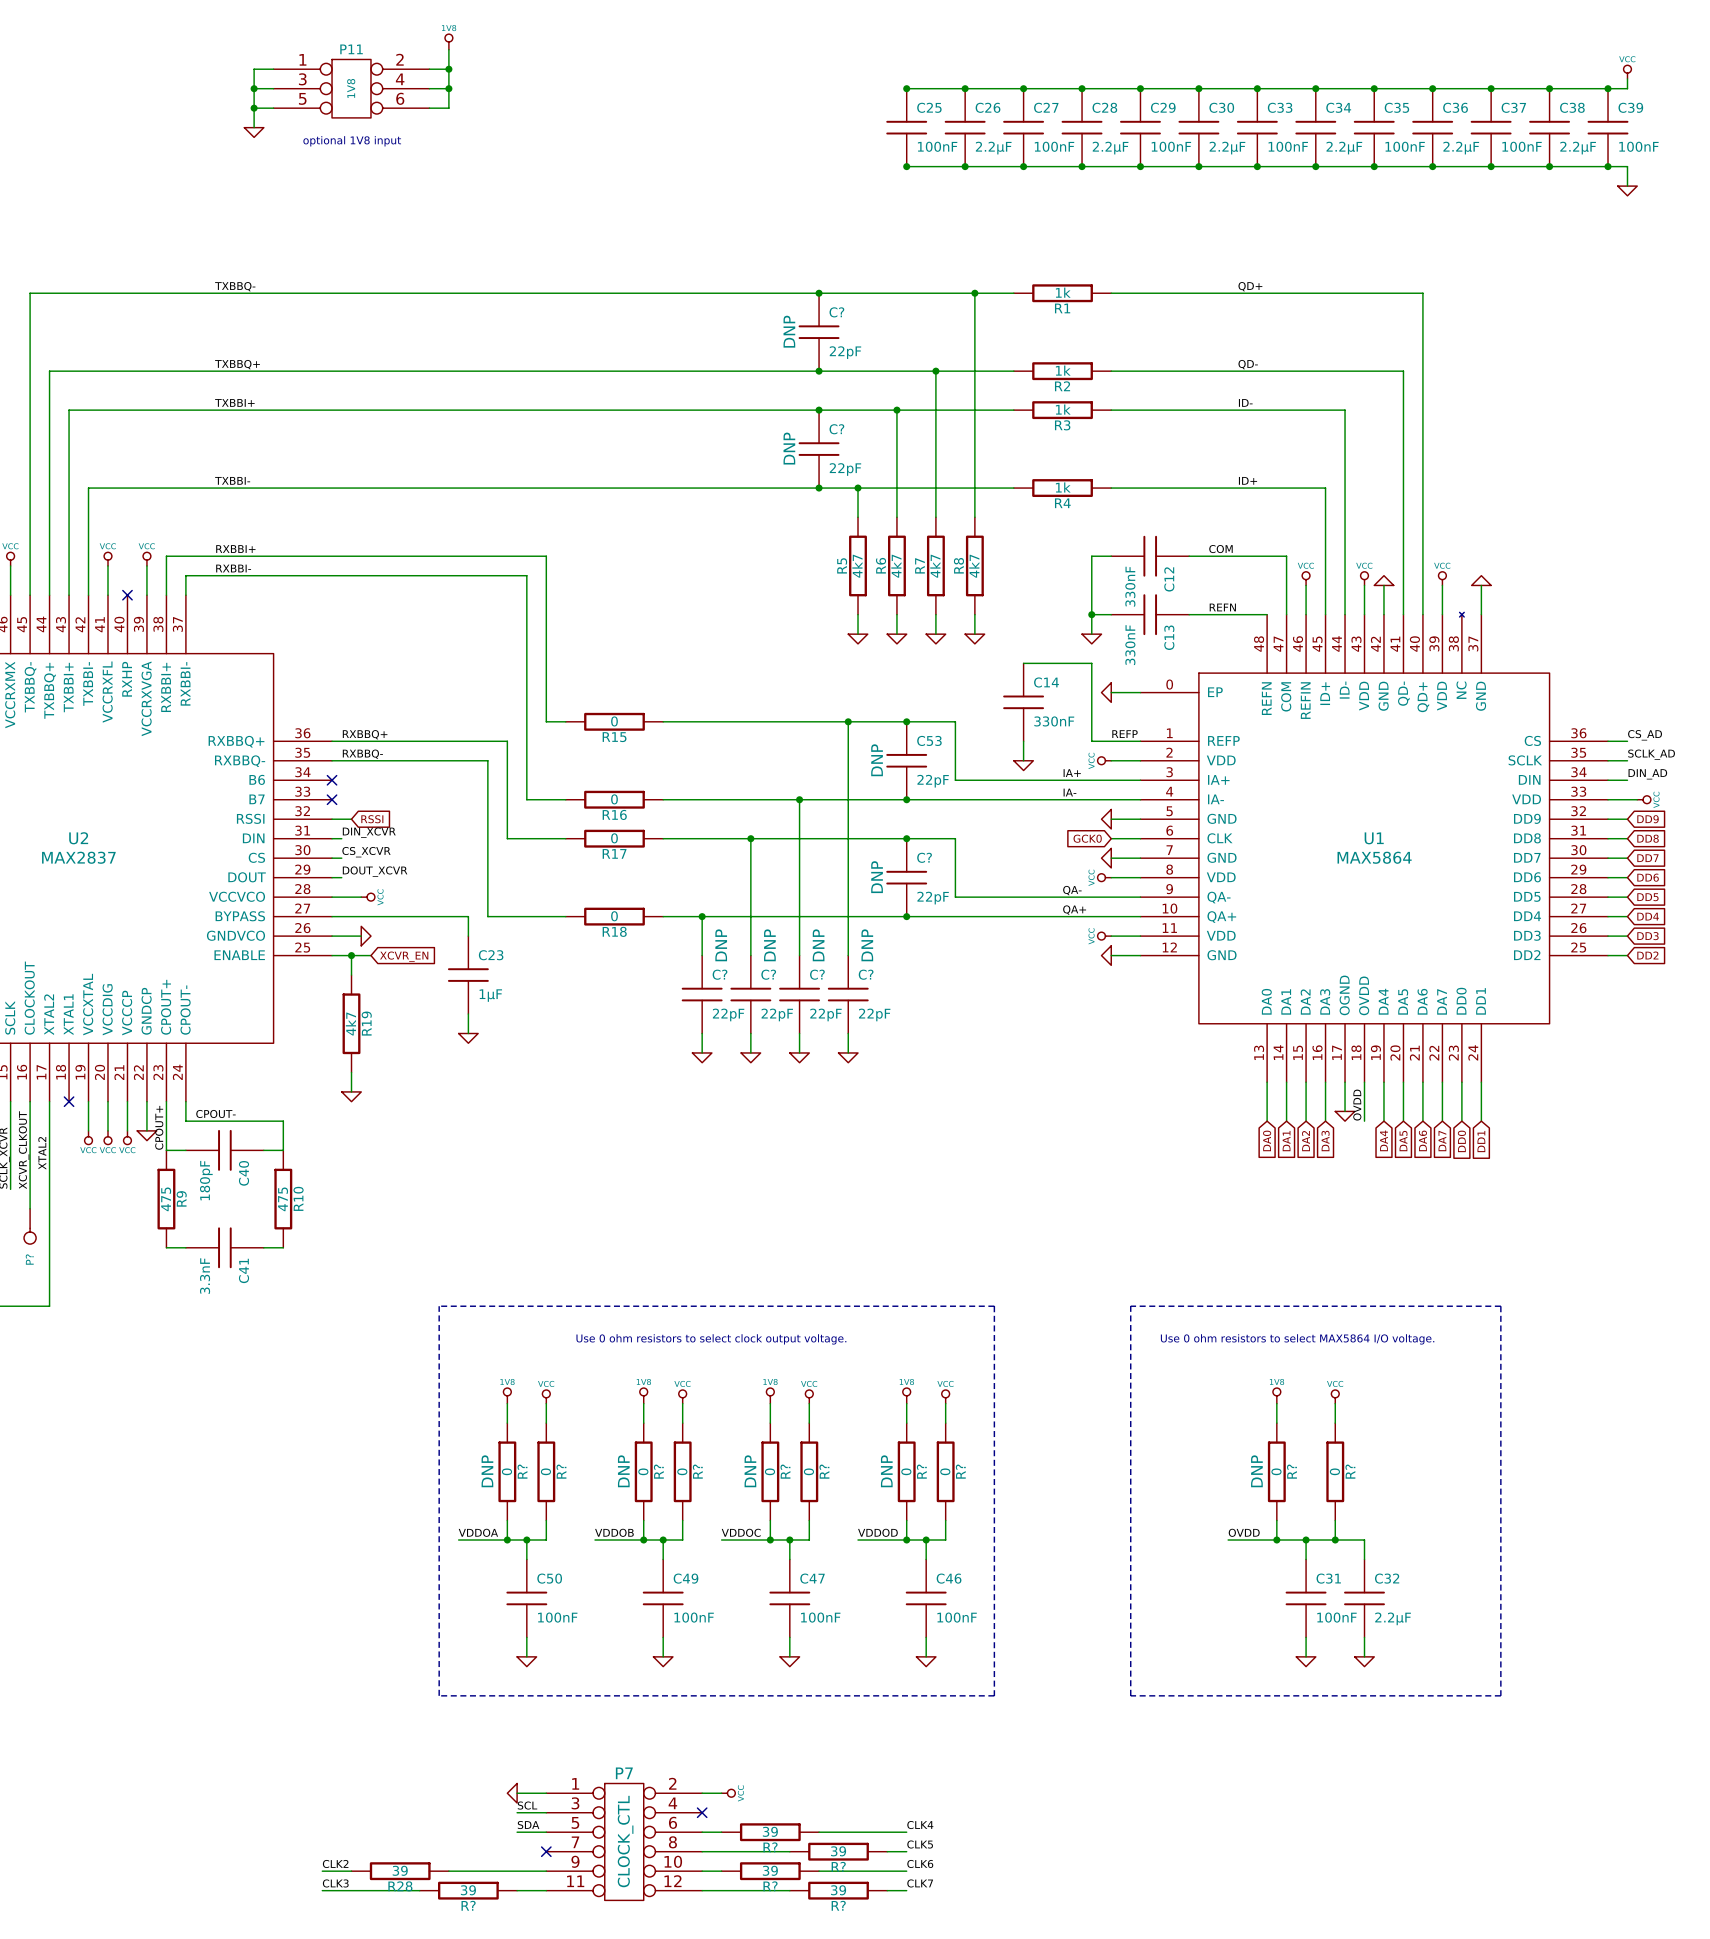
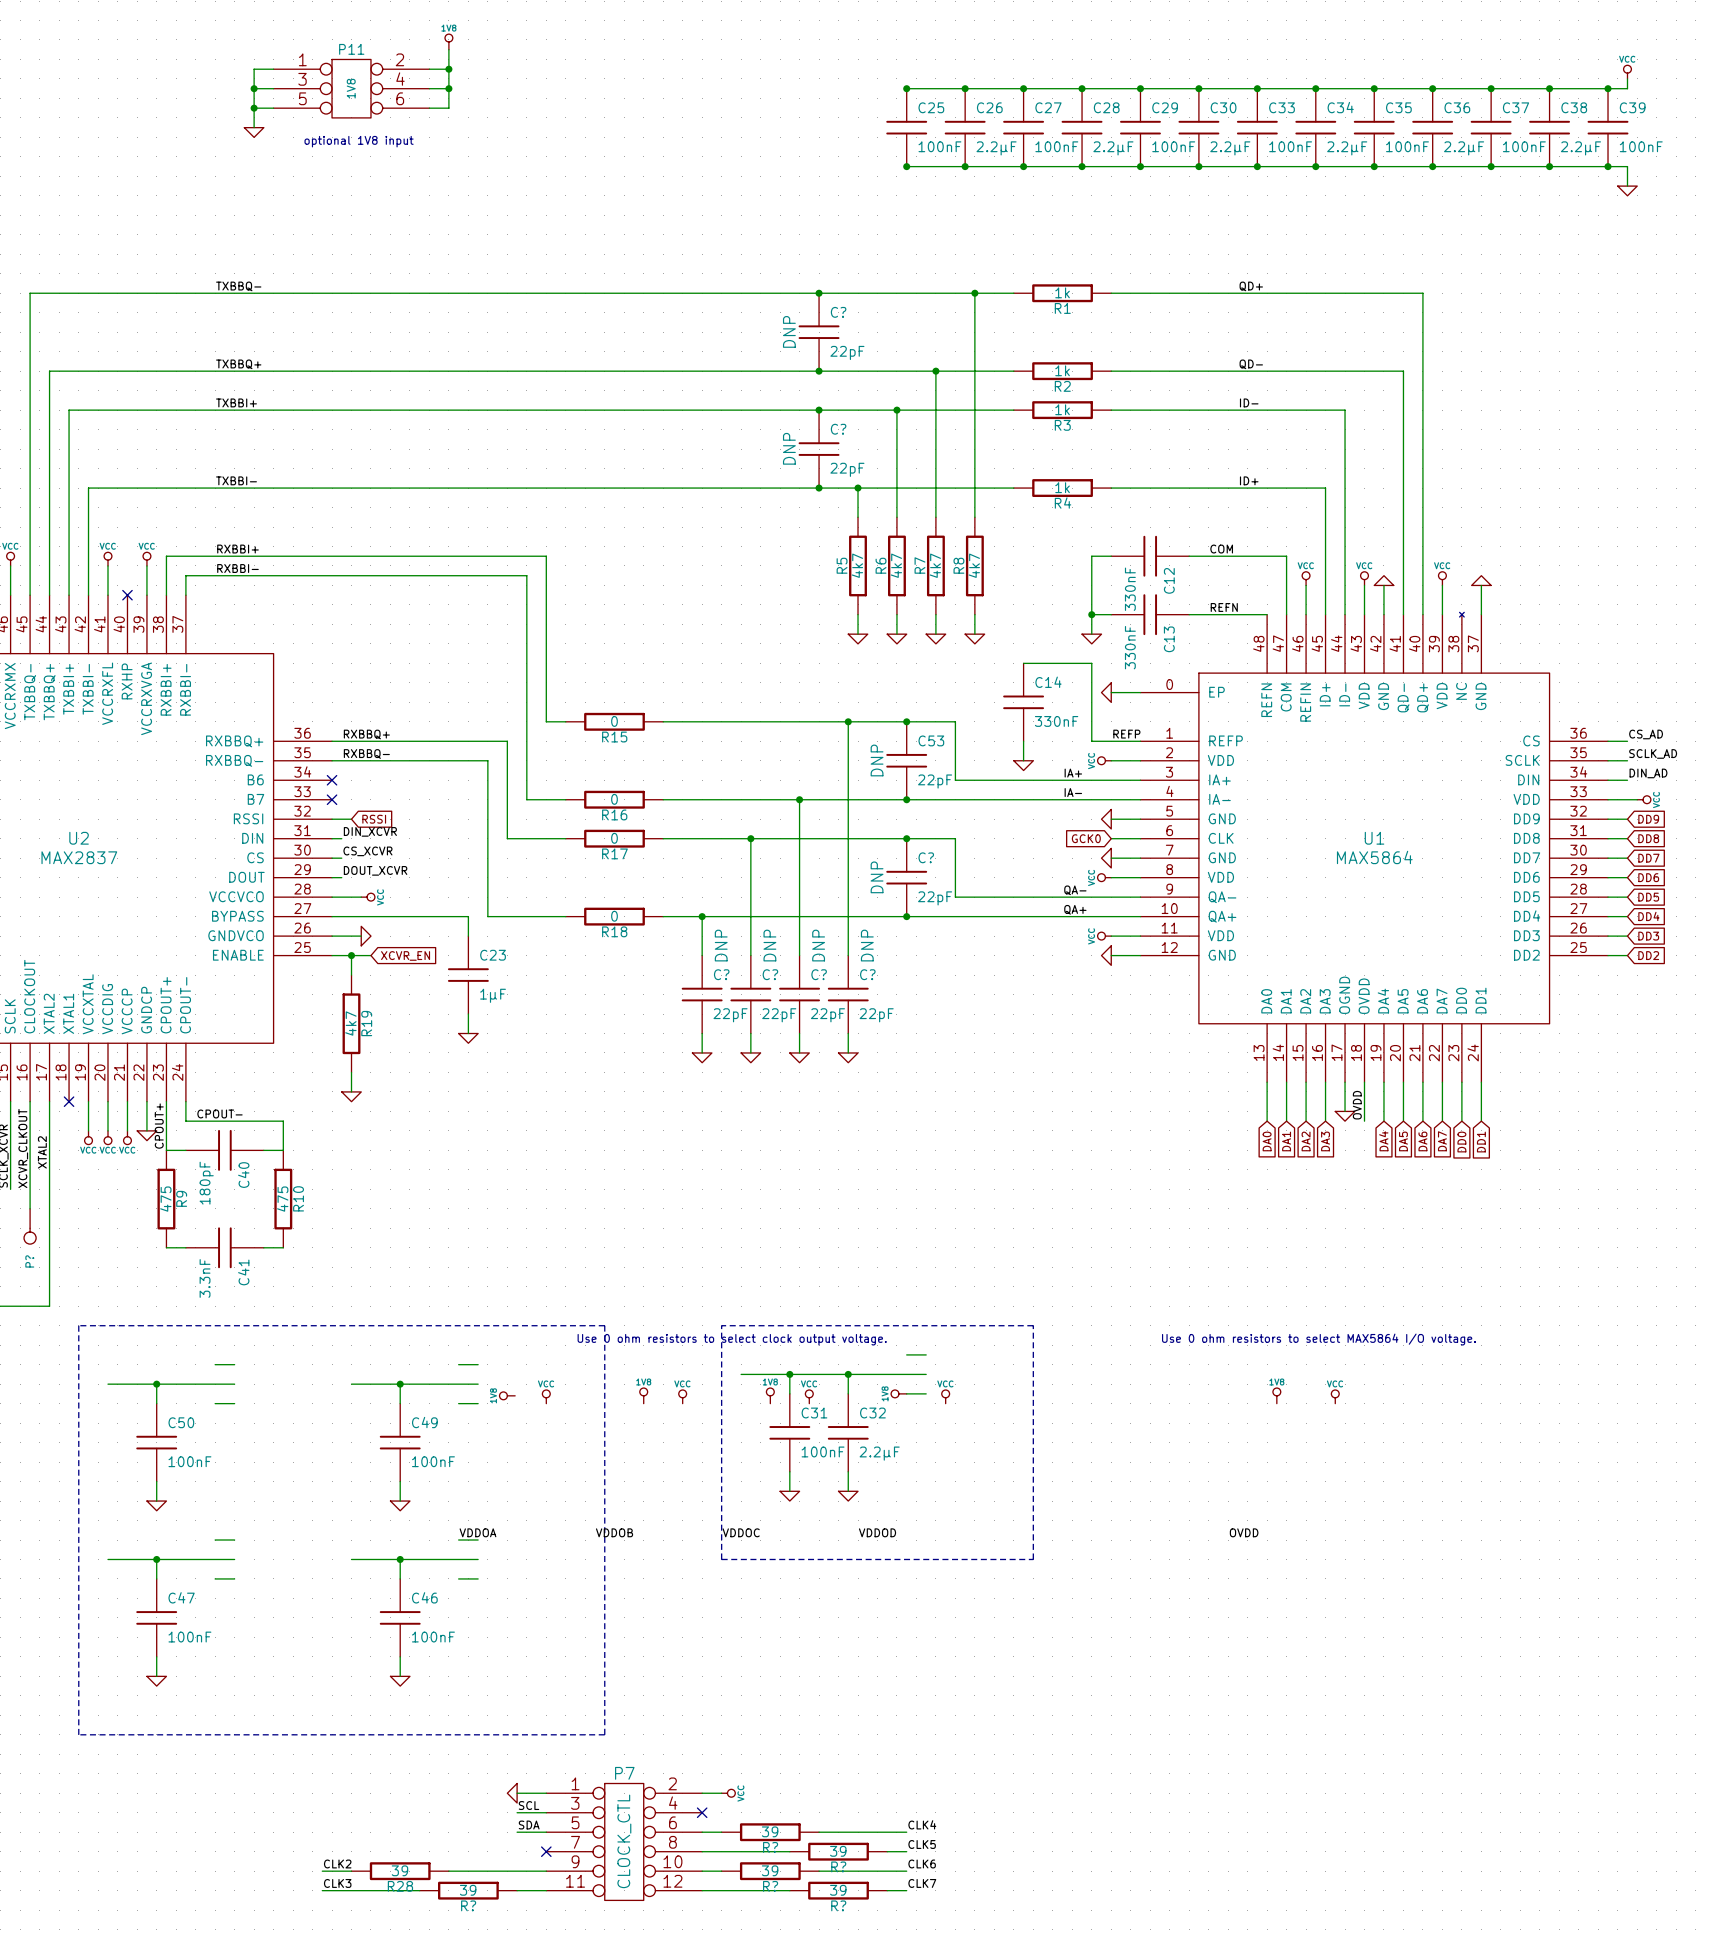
line: (439, 1306) (994, 1306) (994, 1695) (439, 1695) (439, 1306) -> none
line: (1130, 1306) (1500, 1306) (1500, 1695) (1130, 1695) (1130, 1306) -> none
line: none -> (78, 1325) (604, 1325) (604, 1734) (78, 1734) (78, 1325)
line: none -> (721, 1325) (721, 1559) (1033, 1559) (1033, 1325) (721, 1325)
wire: none -> (906, 1354) (926, 1354)
wire: none -> (215, 1364) (234, 1364)
wire: none -> (458, 1364) (478, 1364)
wire: none -> (741, 1374) (926, 1374)
junction: none -> (789, 1374)
junction: none -> (848, 1374)
wire: none -> (108, 1384) (234, 1384)
wire: none -> (156, 1384) (156, 1403)
junction: none -> (156, 1384)
wire: none -> (351, 1384) (478, 1384)
junction: none -> (400, 1384)
wire: none -> (906, 1393) (926, 1393)
power symbol rotation: 0° (507, 1395) -> 90° counterclockwise (507, 1395)
power symbol rotation: 0° (906, 1395) -> 90° counterclockwise (898, 1393)
wire: none -> (215, 1403) (234, 1403)
wire: none -> (458, 1403) (478, 1403)
wire: (507, 1403) (507, 1423) -> (400, 1384) (400, 1403)
wire: (546, 1403) (546, 1423) -> none
wire: (643, 1403) (643, 1423) -> none
wire: (682, 1403) (682, 1423) -> none
wire: (770, 1403) (770, 1423) -> none
wire: (809, 1403) (809, 1423) -> none
wire: (906, 1403) (906, 1423) -> none
wire: (945, 1403) (945, 1423) -> none
wire: (1276, 1403) (1276, 1423) -> none
wire: (1335, 1403) (1335, 1423) -> none
R?: 0 (507, 1471) -> none
R?: 0 (546, 1471) -> none
R?: 0 (643, 1471) -> none
R?: 0 (682, 1471) -> none
R?: 0 (770, 1471) -> none
R?: 0 (809, 1471) -> none
R?: 0 (906, 1471) -> none
R?: 0 (945, 1471) -> none
R?: 0 (1276, 1471) -> none
R?: 0 (1335, 1471) -> none
wire: none -> (156, 1481) (156, 1501)
power symbol: none -> (789, 1496)
power symbol: none -> (848, 1496)
power symbol: none -> (156, 1505)
power symbol: none -> (400, 1505)
wire: (507, 1520) (507, 1540) -> (400, 1481) (400, 1501)
wire: (546, 1520) (546, 1540) (478, 1540) -> none
wire: (643, 1520) (643, 1540) -> none
wire: (682, 1520) (682, 1540) (595, 1540) -> none
wire: (770, 1520) (770, 1540) -> none
wire: (809, 1520) (809, 1540) (721, 1540) -> none
wire: (906, 1520) (906, 1540) -> none
wire: (945, 1520) (945, 1540) (858, 1540) -> none
wire: (1276, 1520) (1276, 1540) -> none
wire: (1335, 1520) (1335, 1540) -> none
wire: none -> (215, 1540) (234, 1540)
junction: (507, 1540) -> none
wire: (526, 1540) (526, 1559) -> (400, 1559) (400, 1578)
junction: (526, 1540) -> none
junction: (643, 1540) -> none
wire: (663, 1540) (663, 1559) -> none
junction: (663, 1540) -> none
junction: (770, 1540) -> none
wire: (789, 1540) (789, 1559) -> (789, 1374) (789, 1393)
junction: (789, 1540) -> none
junction: (906, 1540) -> none
wire: (926, 1540) (926, 1559) -> (848, 1374) (848, 1393)
junction: (926, 1540) -> none
wire: (1228, 1540) (1364, 1540) (1364, 1559) -> none
junction: (1276, 1540) -> none
wire: (1306, 1540) (1306, 1559) -> none
junction: (1306, 1540) -> none
junction: (1335, 1540) -> none
wire: none -> (108, 1559) (234, 1559)
wire: none -> (156, 1559) (156, 1578)
junction: none -> (156, 1559)
wire: none -> (351, 1559) (478, 1559)
junction: none -> (400, 1559)
wire: none -> (215, 1578) (234, 1578)
wire: none -> (458, 1578) (478, 1578)
C50 position: (526, 1598) -> (156, 1442)
C49 position: (663, 1598) -> (400, 1442)
C47 position: (789, 1598) -> (156, 1617)
C46 position: (926, 1598) -> (400, 1617)
C31 position: (1306, 1598) -> (789, 1432)
C32 position: (1364, 1598) -> (848, 1432)
wire: (526, 1637) (526, 1656) -> (400, 1656) (400, 1676)
wire: (663, 1637) (663, 1656) -> none
wire: (789, 1637) (789, 1656) -> (789, 1471) (789, 1491)
wire: (926, 1637) (926, 1656) -> (848, 1471) (848, 1491)
wire: (1306, 1637) (1306, 1656) -> none
wire: (1364, 1637) (1364, 1656) -> none
wire: none -> (156, 1656) (156, 1676)
power symbol: (526, 1661) -> none
power symbol: (663, 1661) -> none
power symbol: (789, 1661) -> none
power symbol: (926, 1661) -> none
power symbol: (1306, 1661) -> none
power symbol: (1364, 1661) -> none
power symbol: none -> (156, 1681)
power symbol: none -> (400, 1681)

